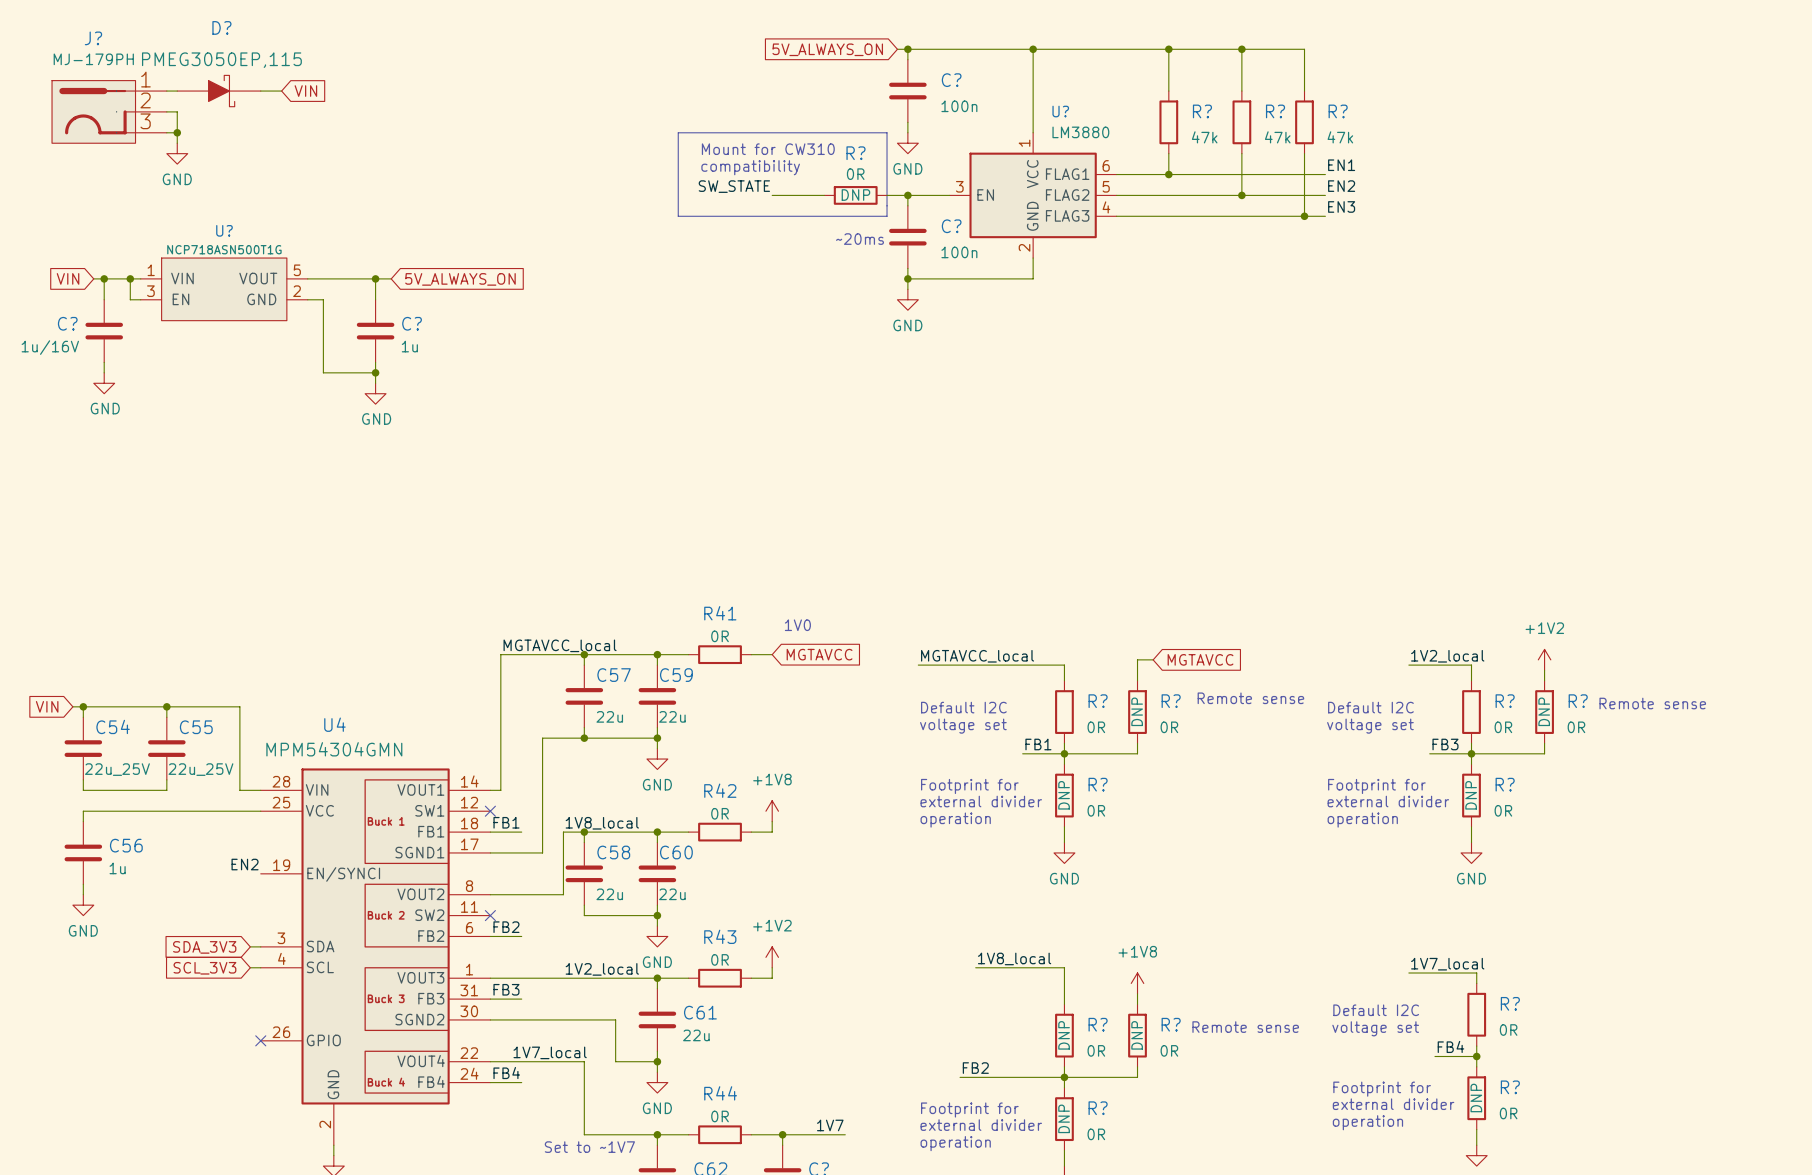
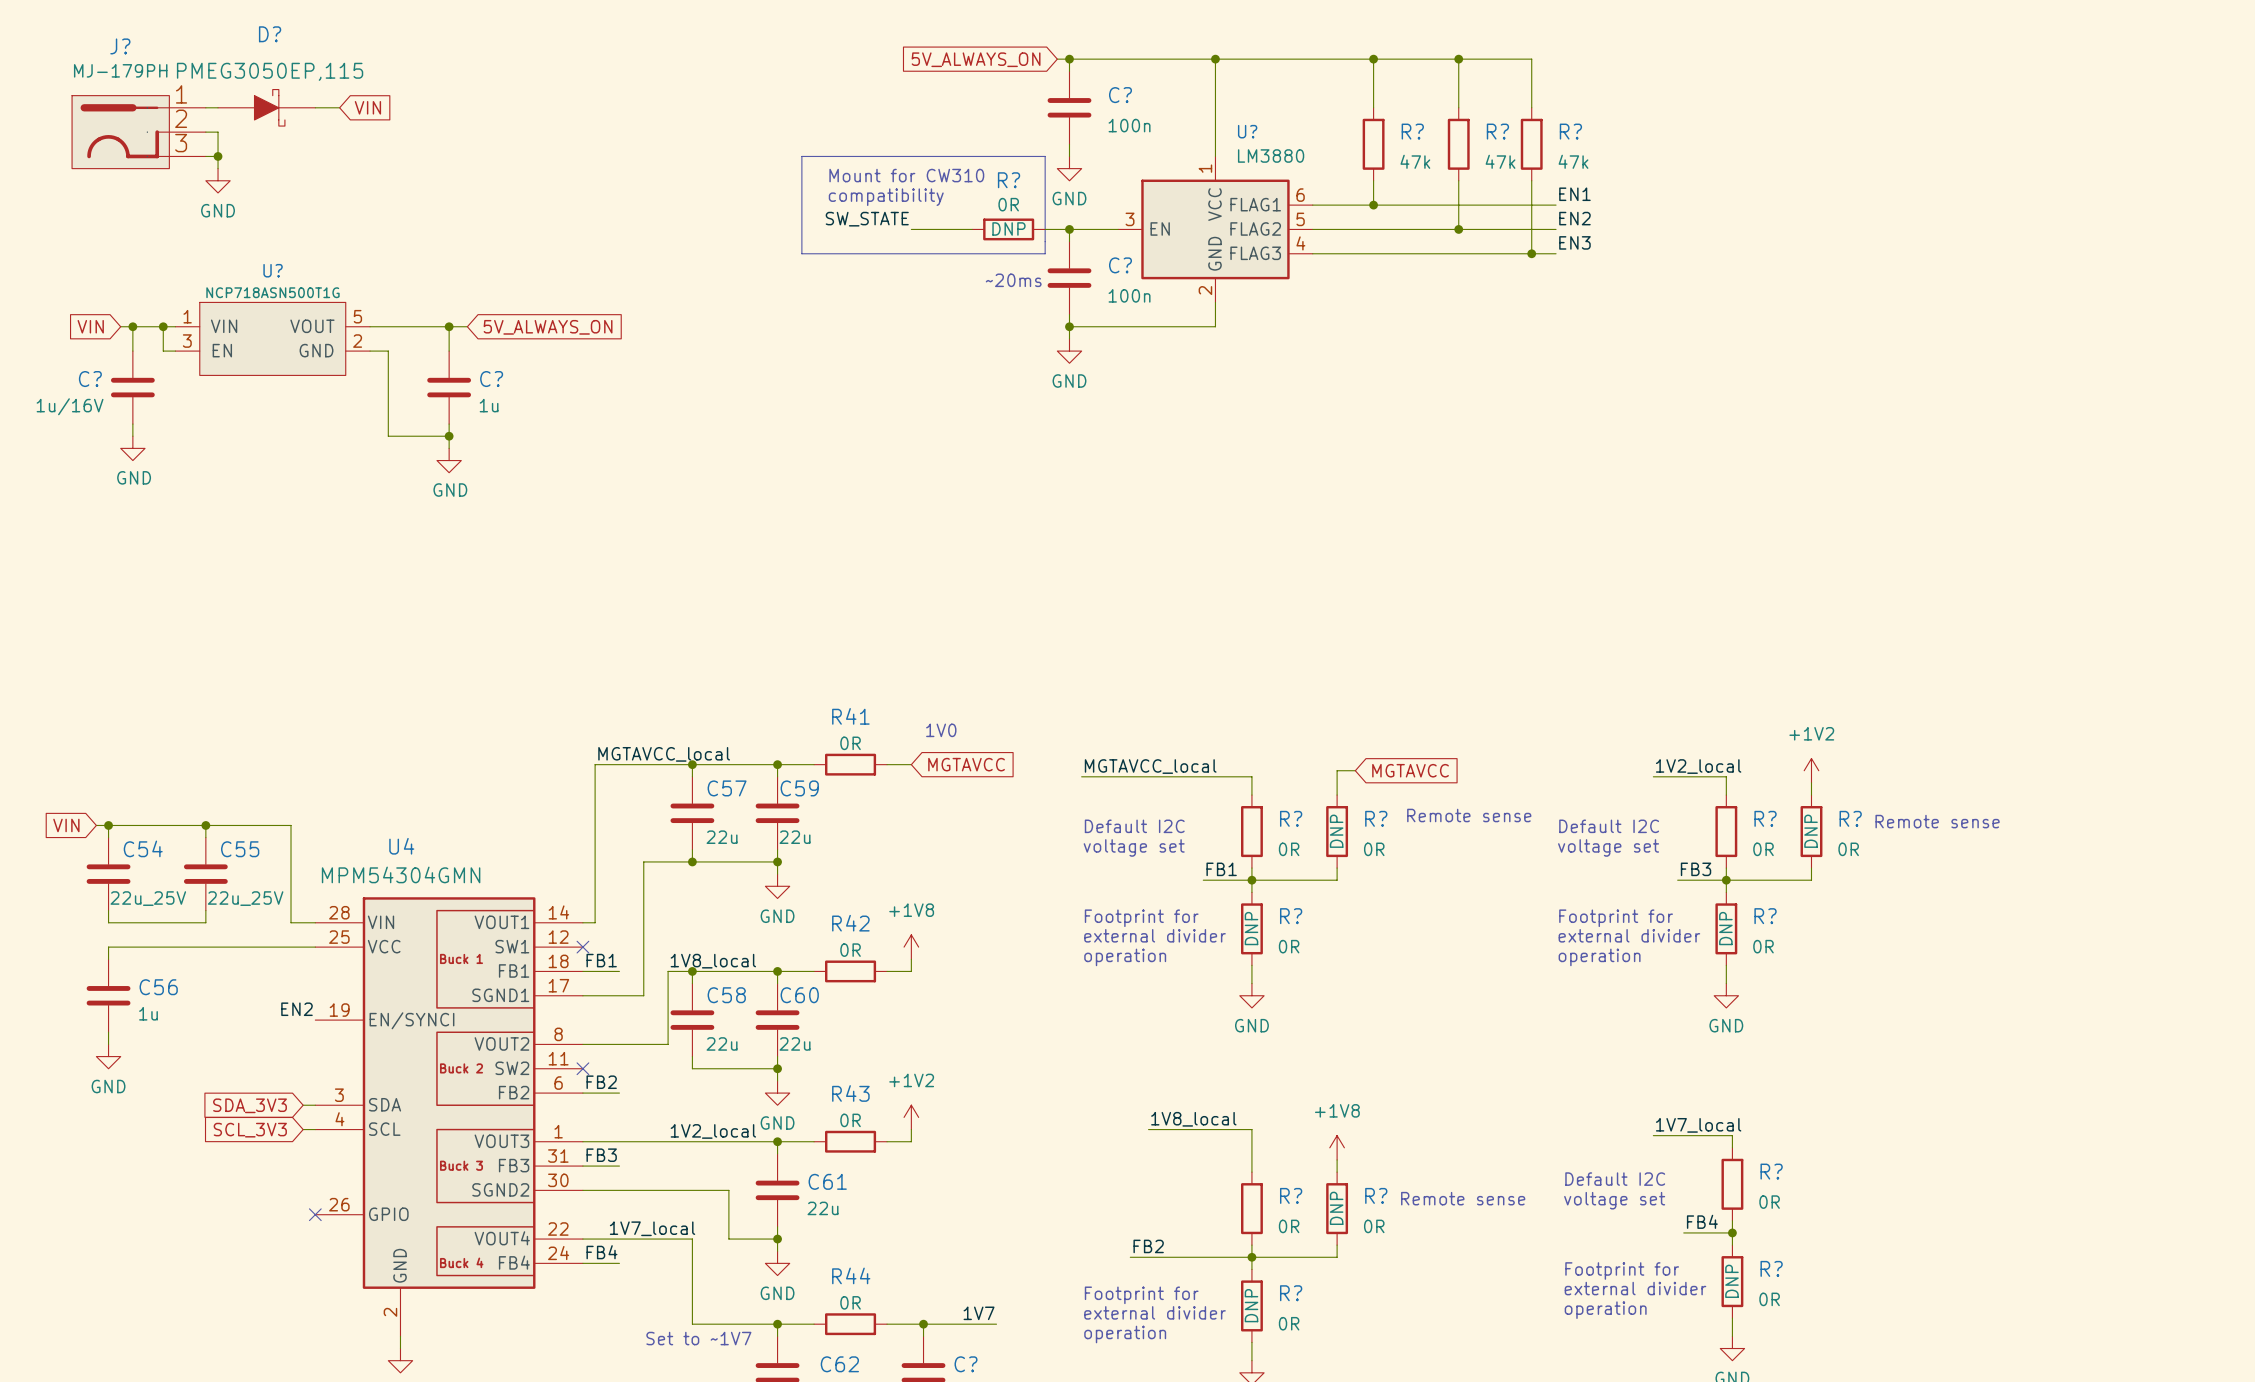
R? text: DNP (1064, 1035) -> none

